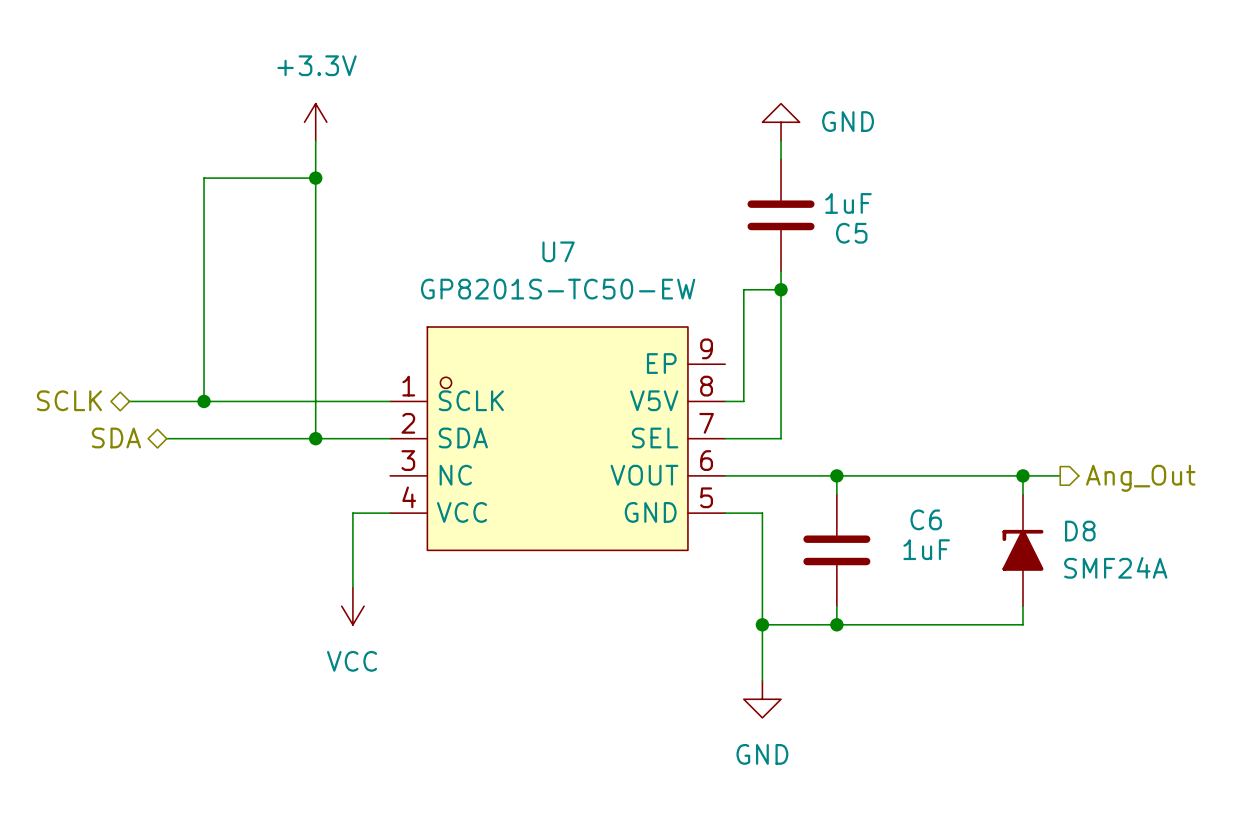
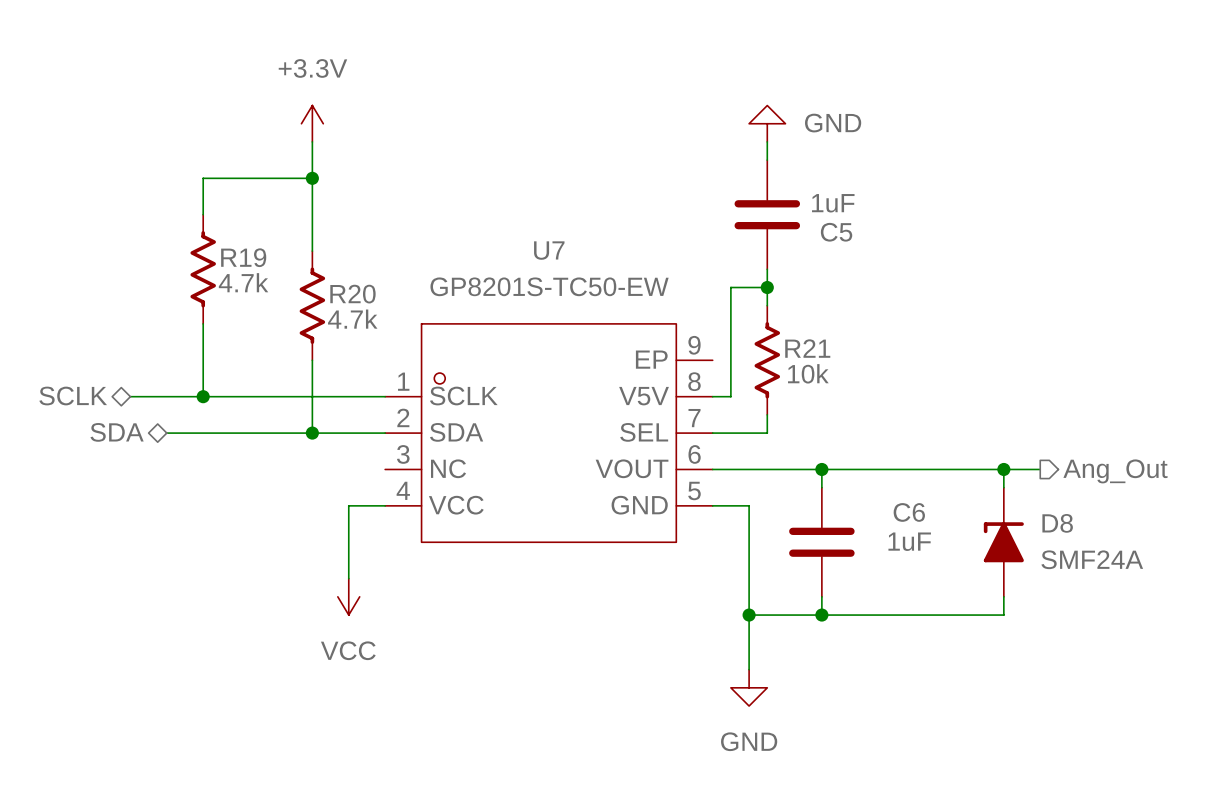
R19: none -> (203, 269)
R20: none -> (312, 305)
R21: none -> (767, 360)

